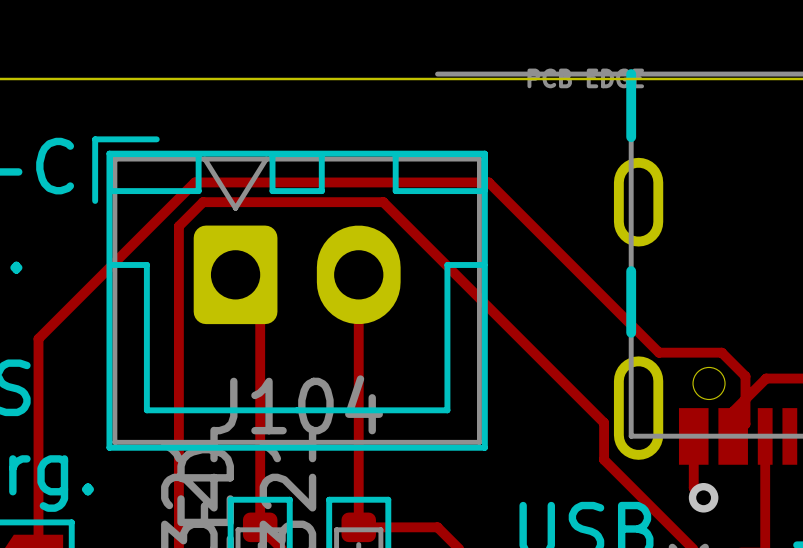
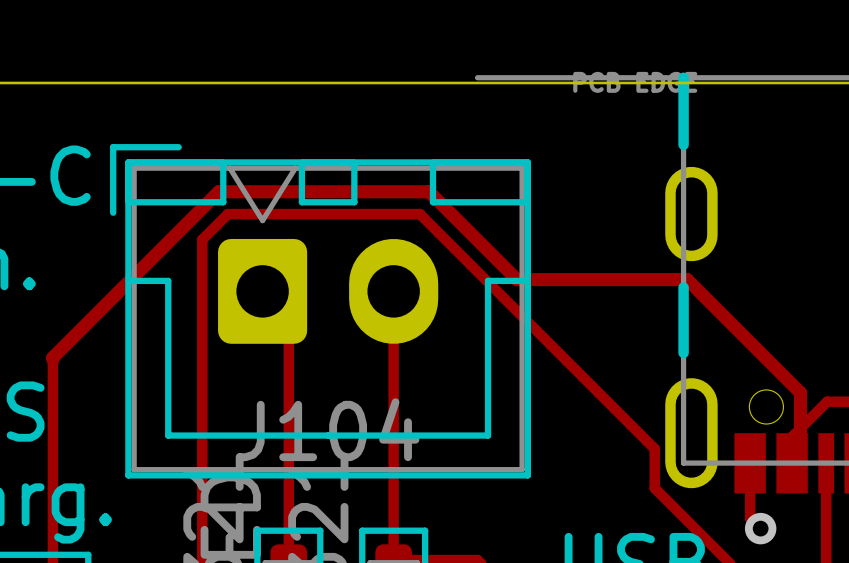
track: (38, 338) (194, 182) (488, 182) (659, 352) (721, 352) (745, 376) (745, 424) (741, 428) -> (52, 359) (218, 191) (429, 191) (516, 279) (687, 279) (800, 392) (800, 454)

